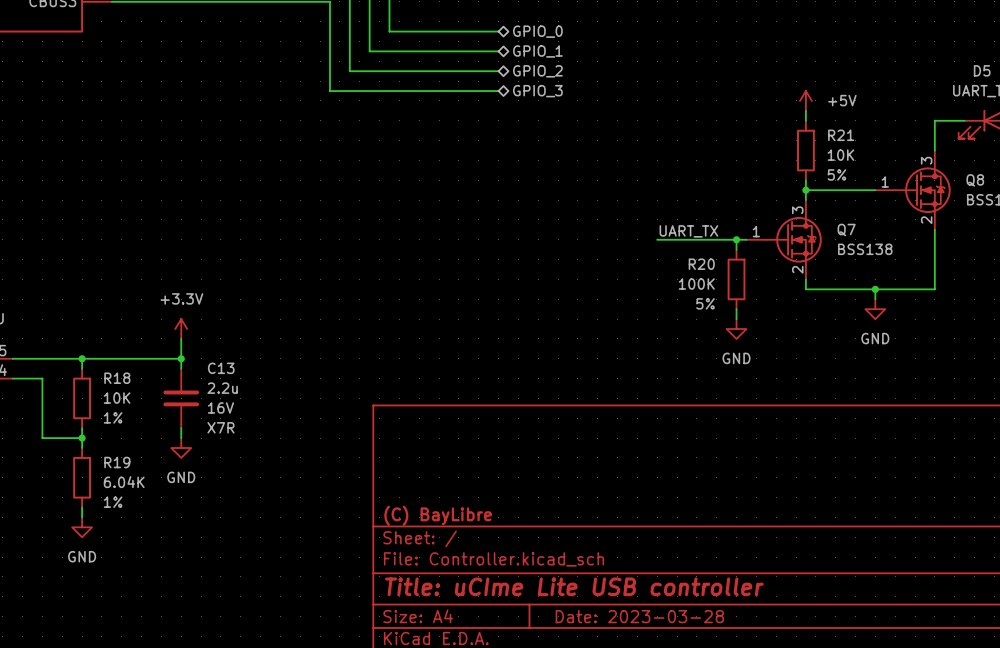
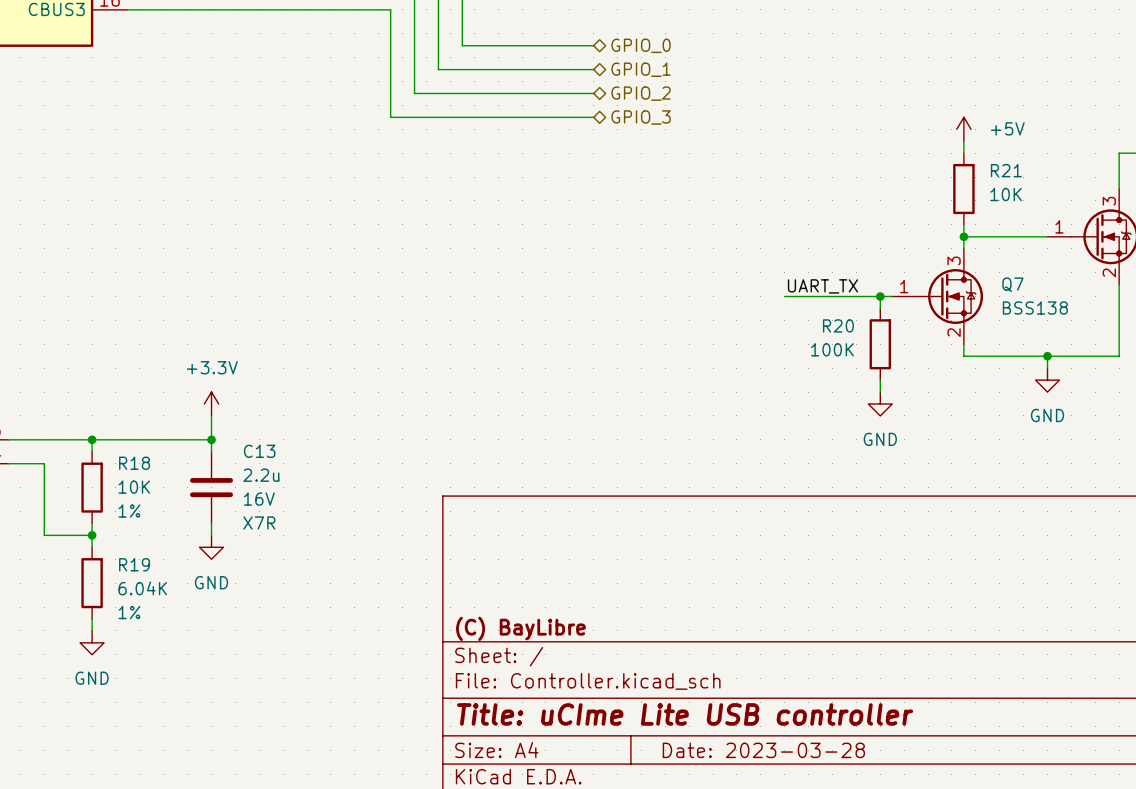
R21 text: 5% (836, 174) -> none
R20 text: 5% (705, 303) -> none

